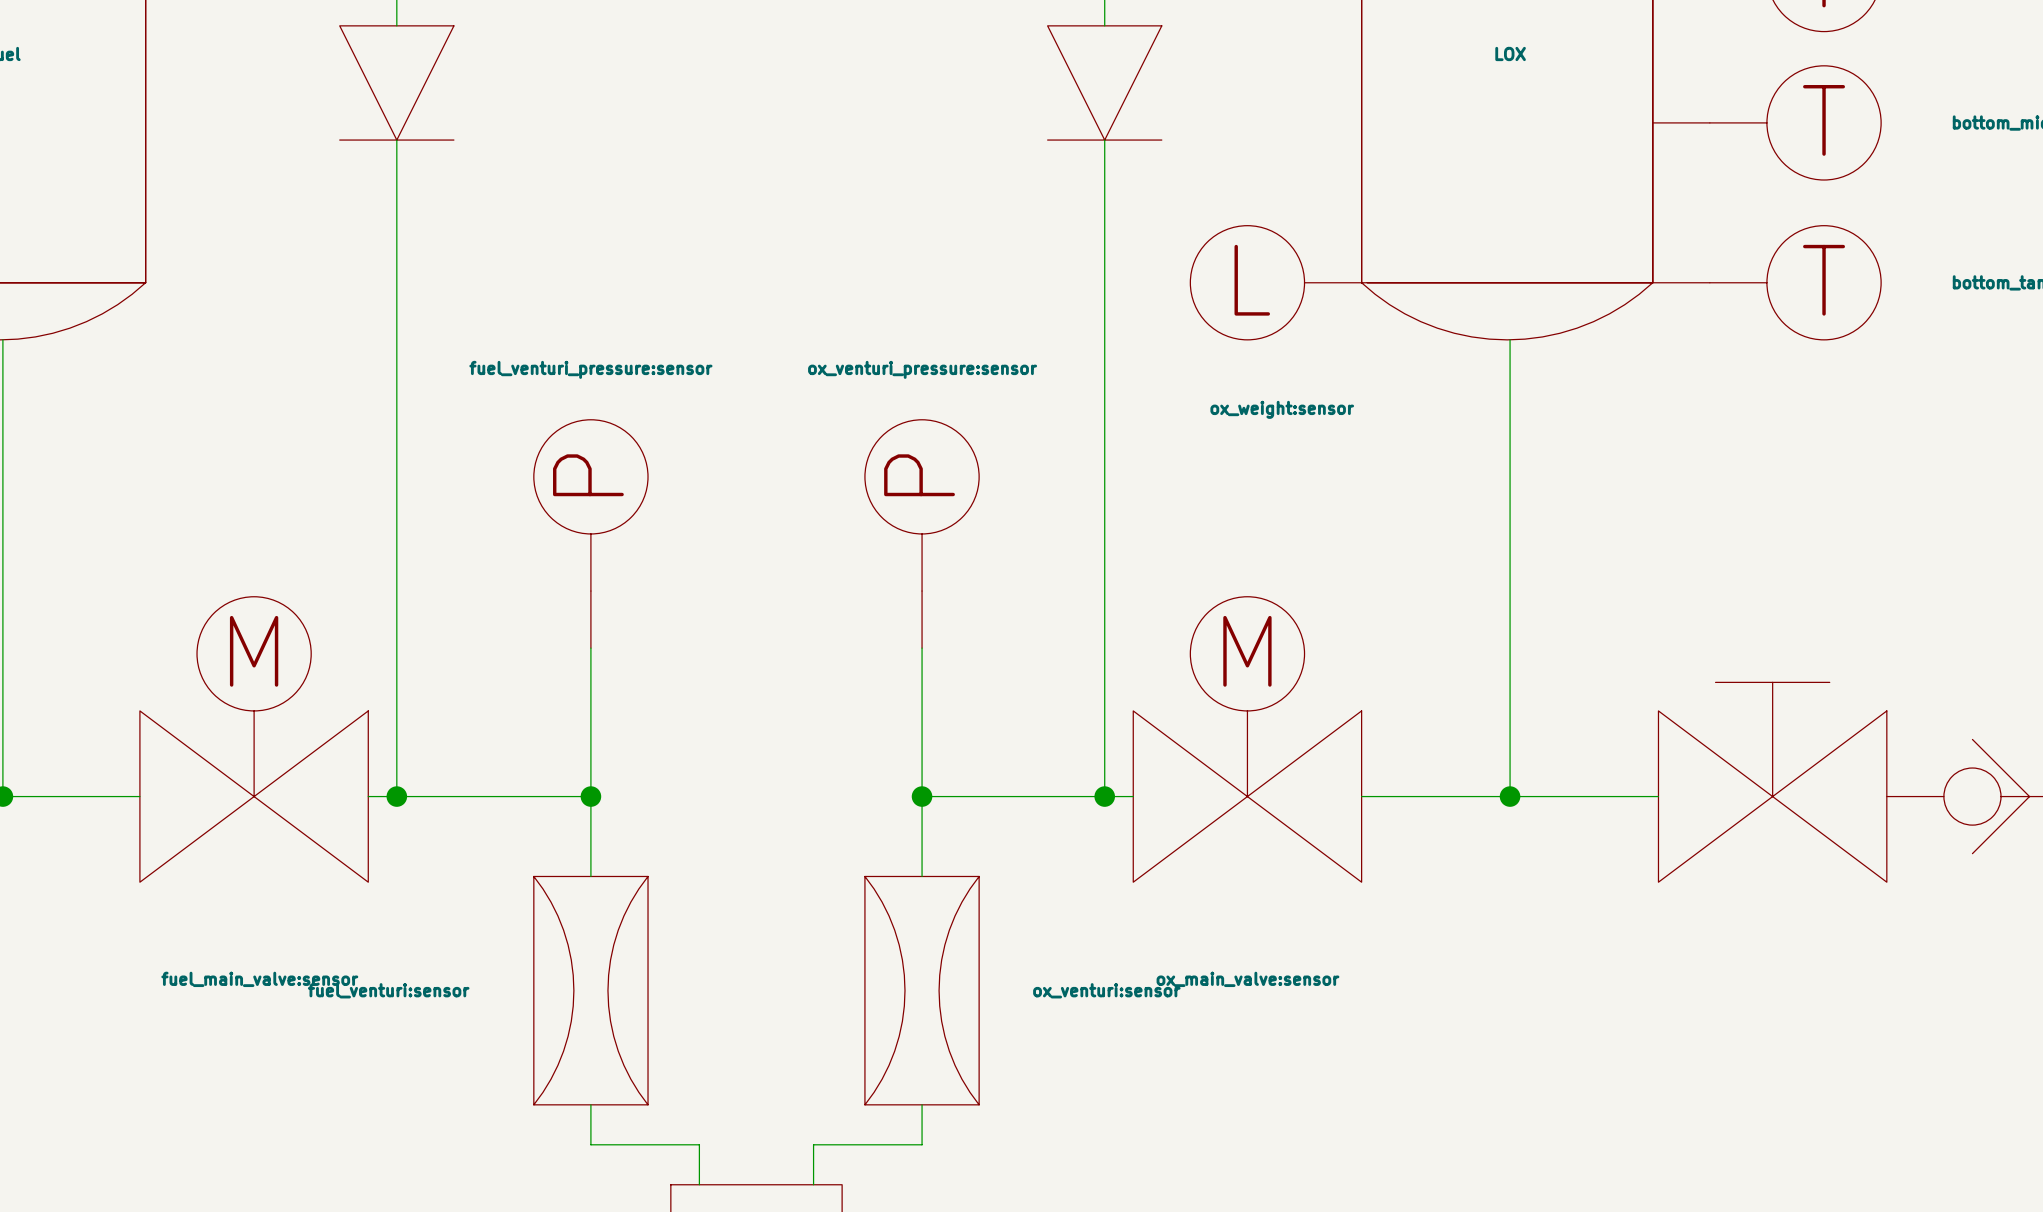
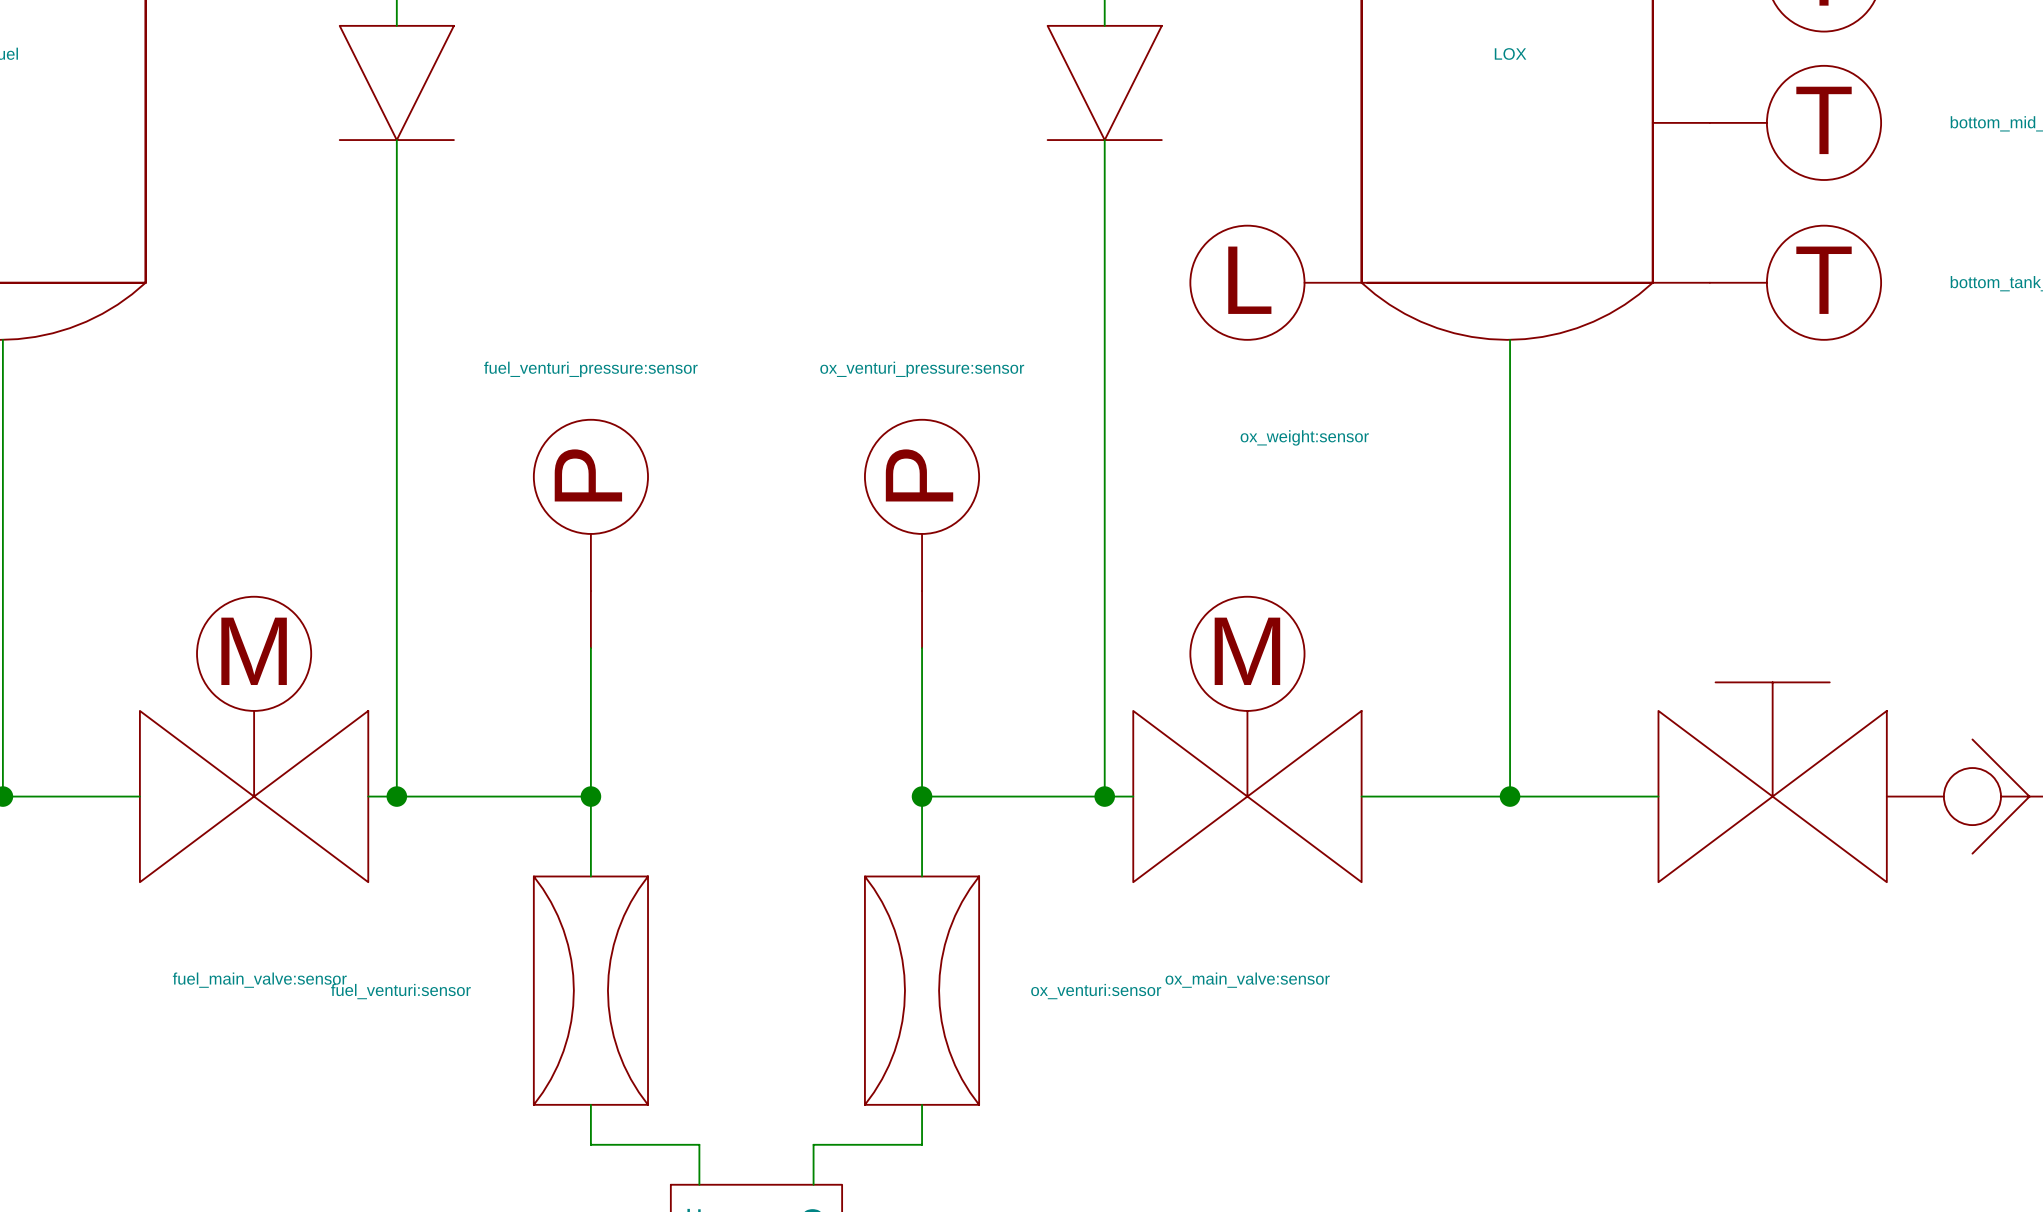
part value position: ox_weight:sensor (1282, 409) -> ox_weight:sensor (1304, 437)

